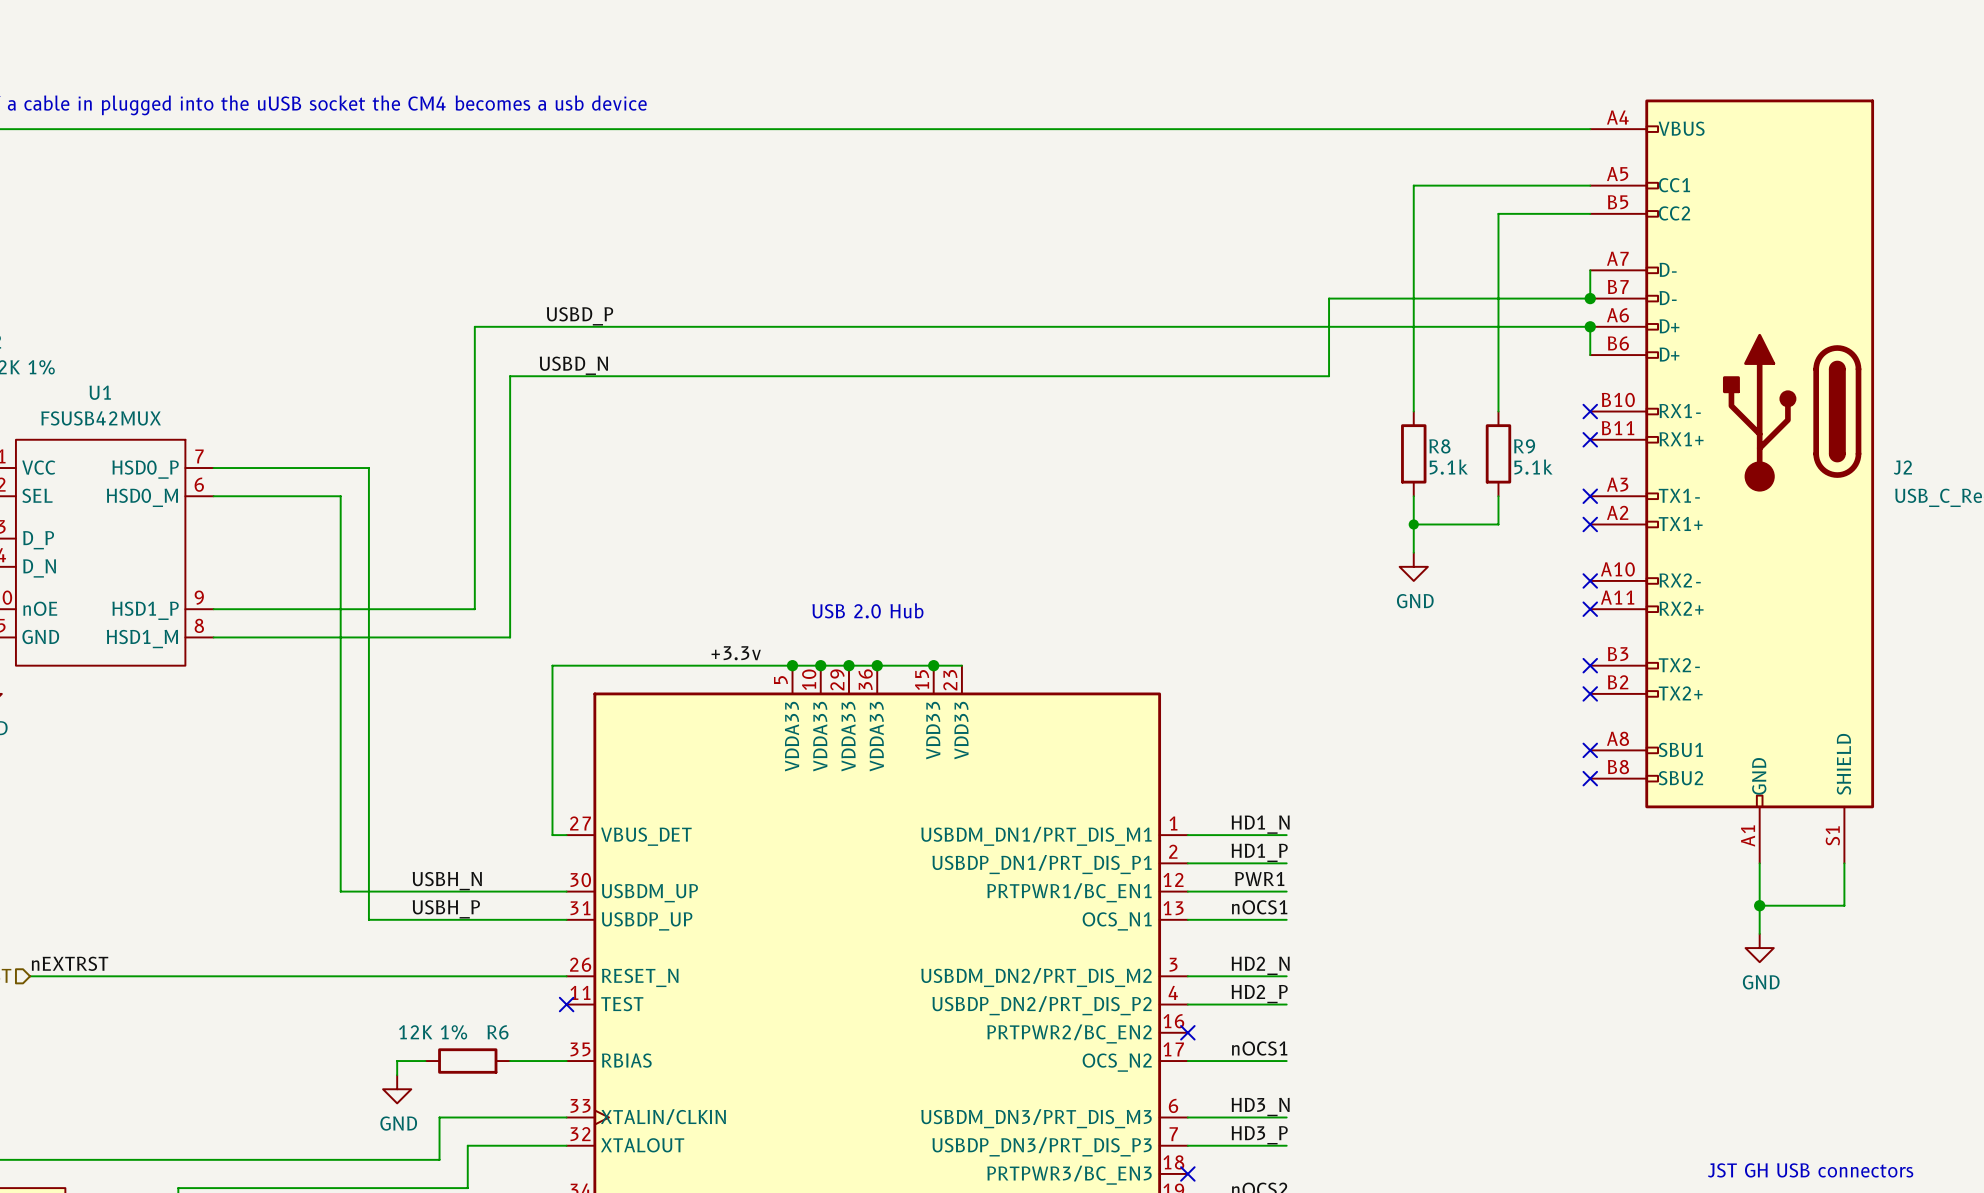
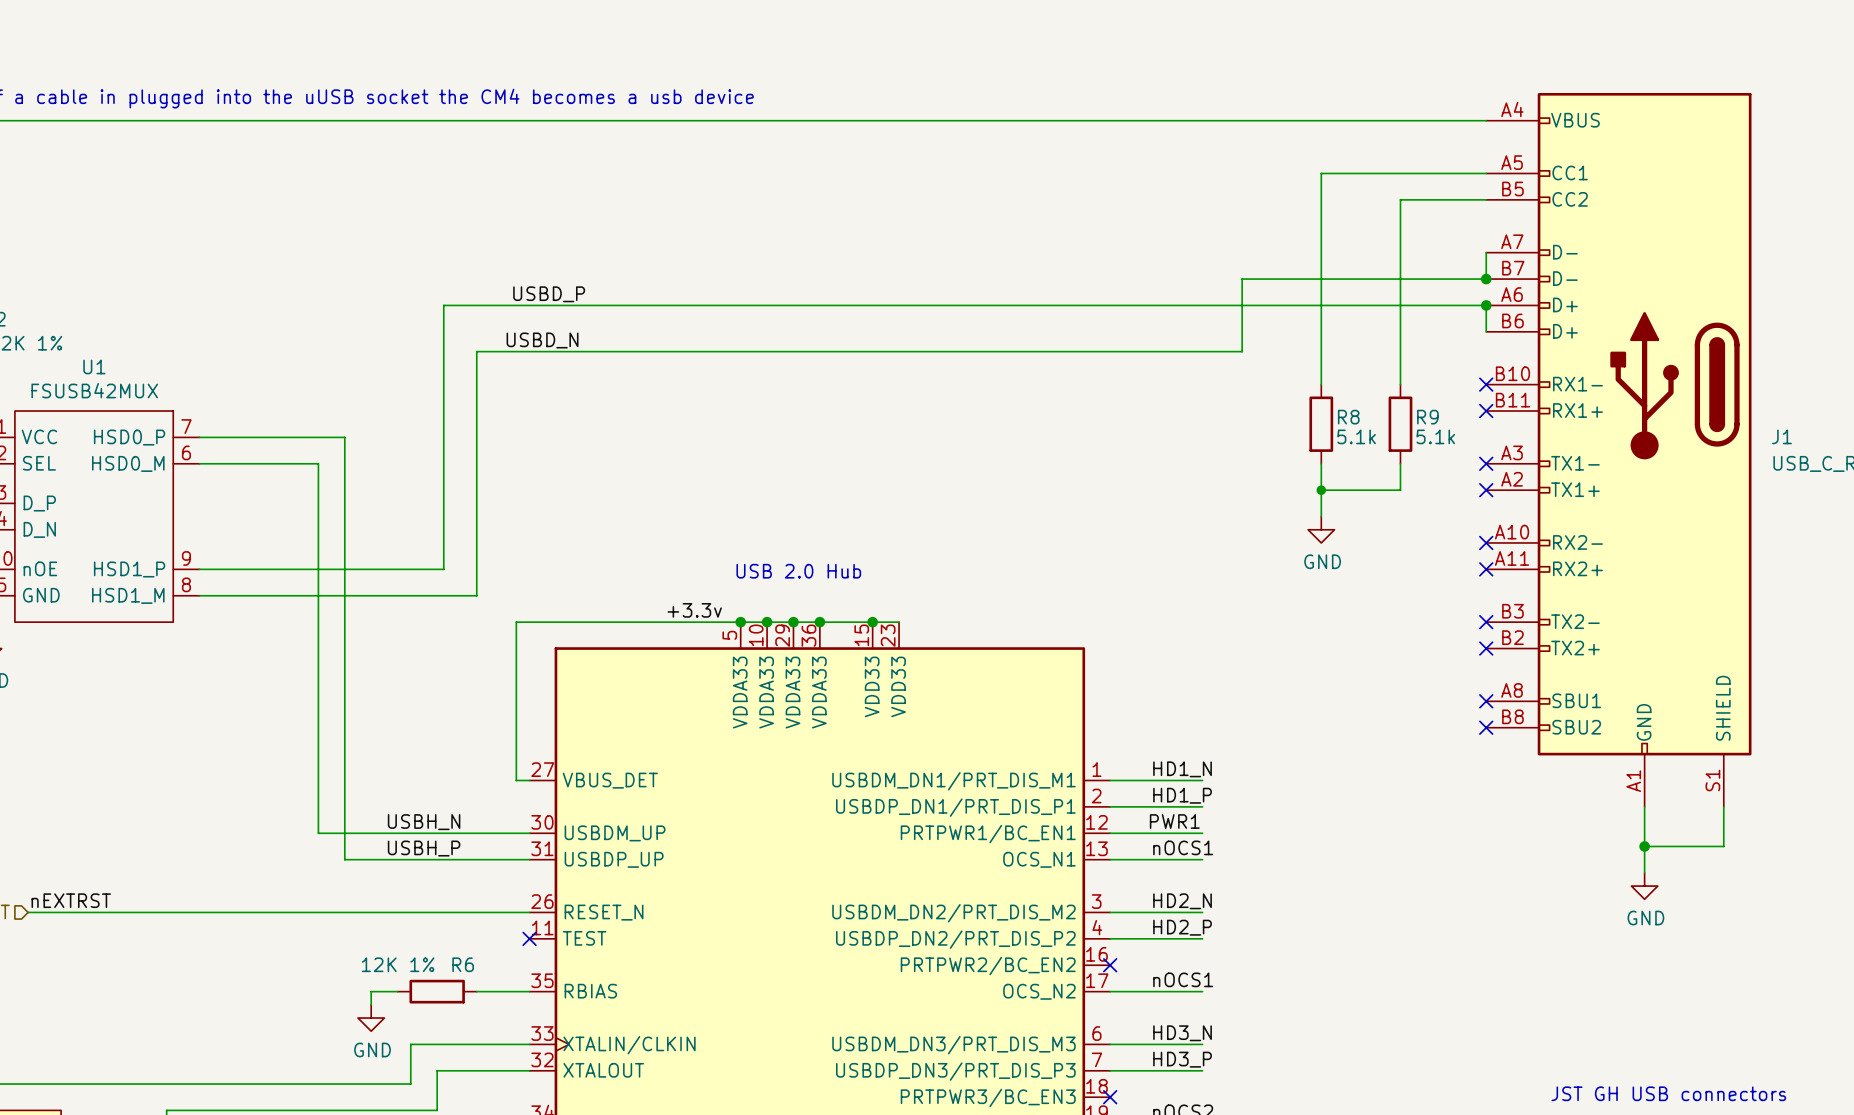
J2 name: J2 (1902, 467) -> J1 (1782, 436)

